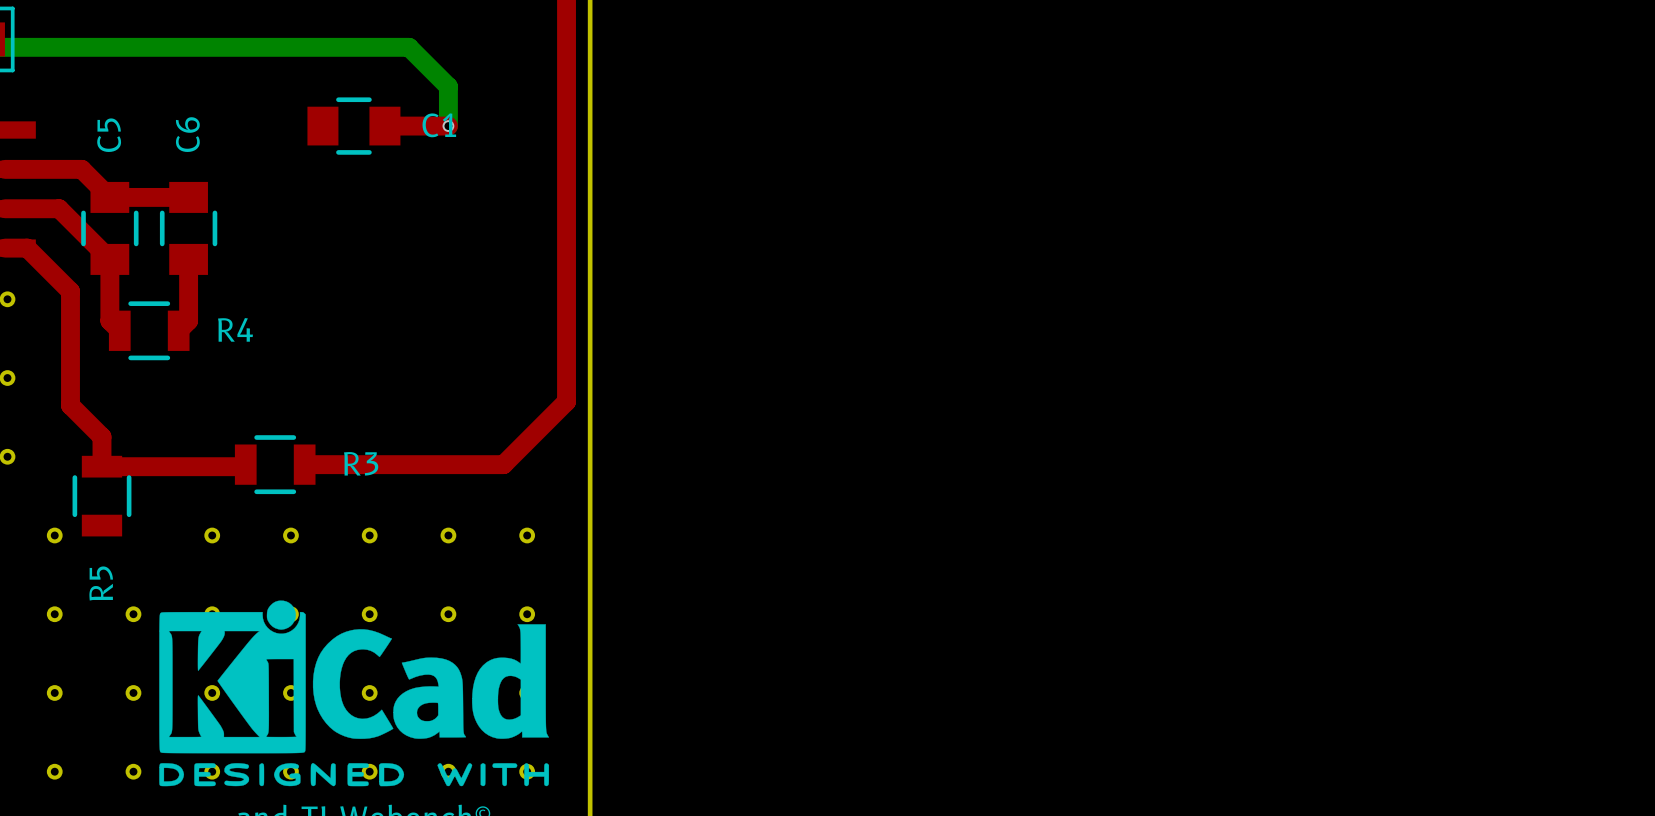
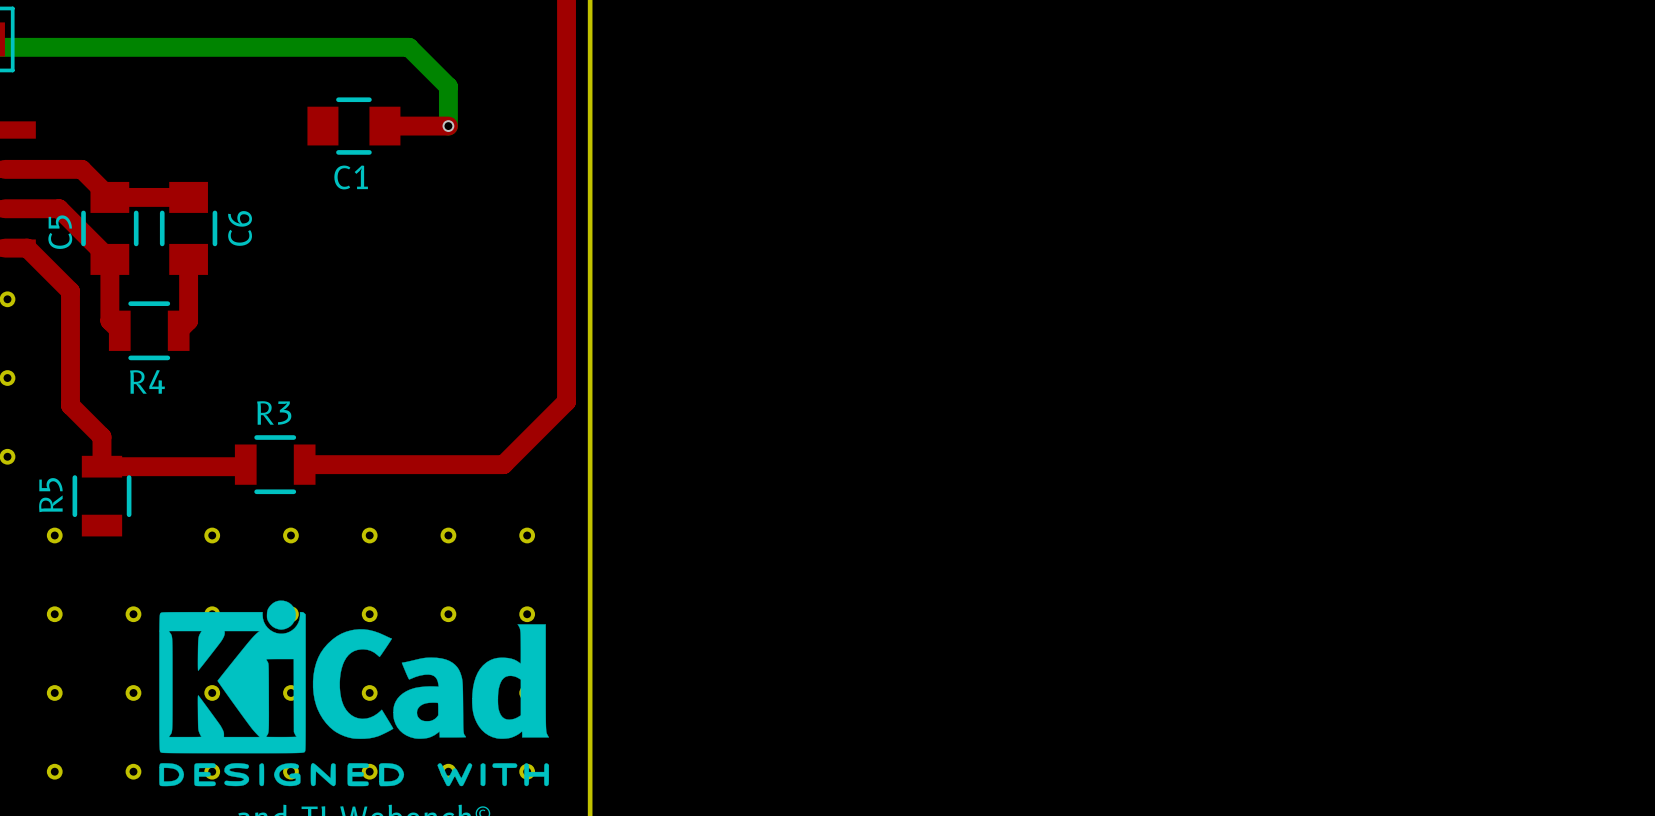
C1 name position: C1 (439, 125) -> C1 (351, 177)
C6 name position: C6 (187, 134) -> C6 (240, 228)
C5 name position: C5 (109, 135) -> C5 (60, 232)
R4 name position: R4 (235, 329) -> R4 (147, 381)
R3 name position: R3 (361, 463) -> R3 (274, 412)
R5 name position: R5 (101, 583) -> R5 (50, 495)

